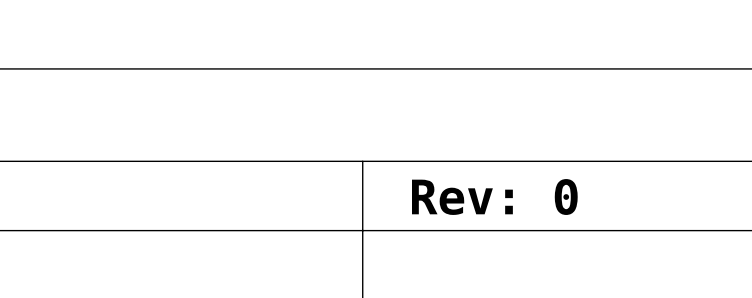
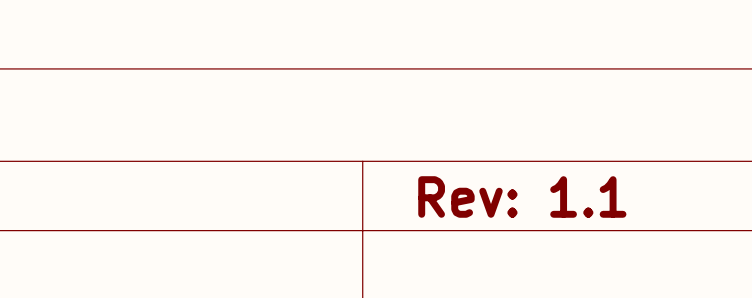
title block: Rev: 0 (494, 197) -> Rev: 1.1 (522, 196)

